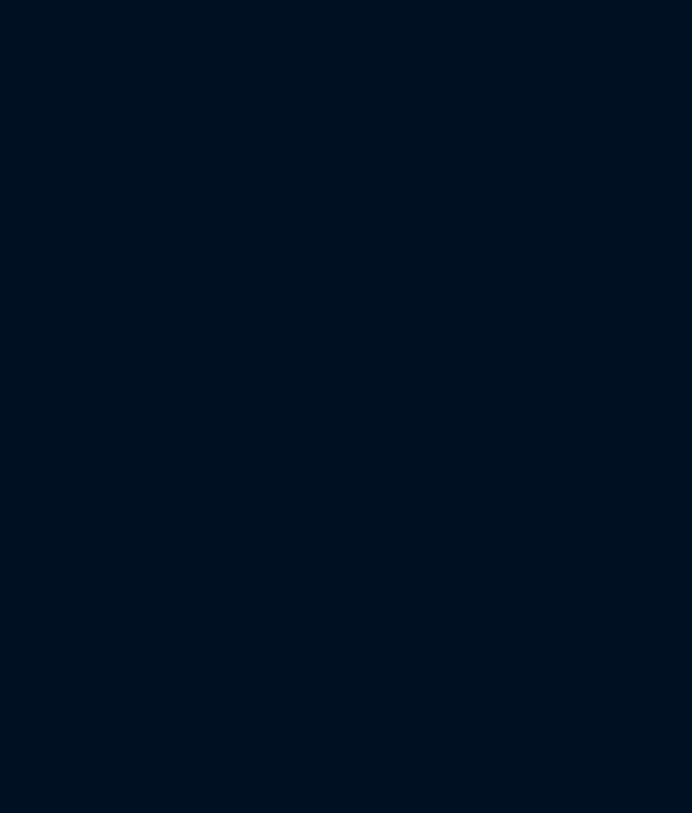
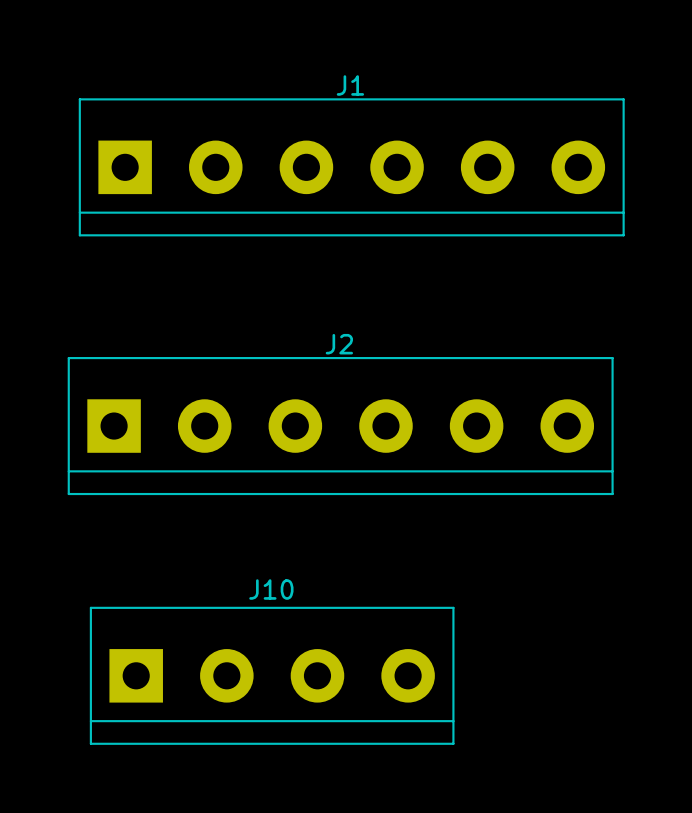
J1: none -> (351, 167)
J2: none -> (340, 426)
J10: none -> (272, 675)

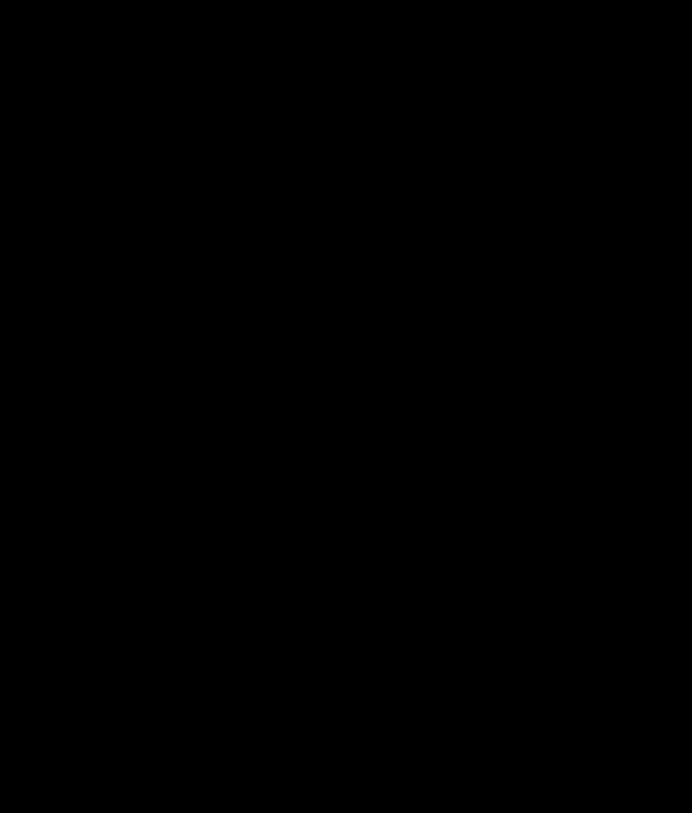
J1: (351, 167) -> none
J2: (340, 426) -> none
J10: (272, 675) -> none

